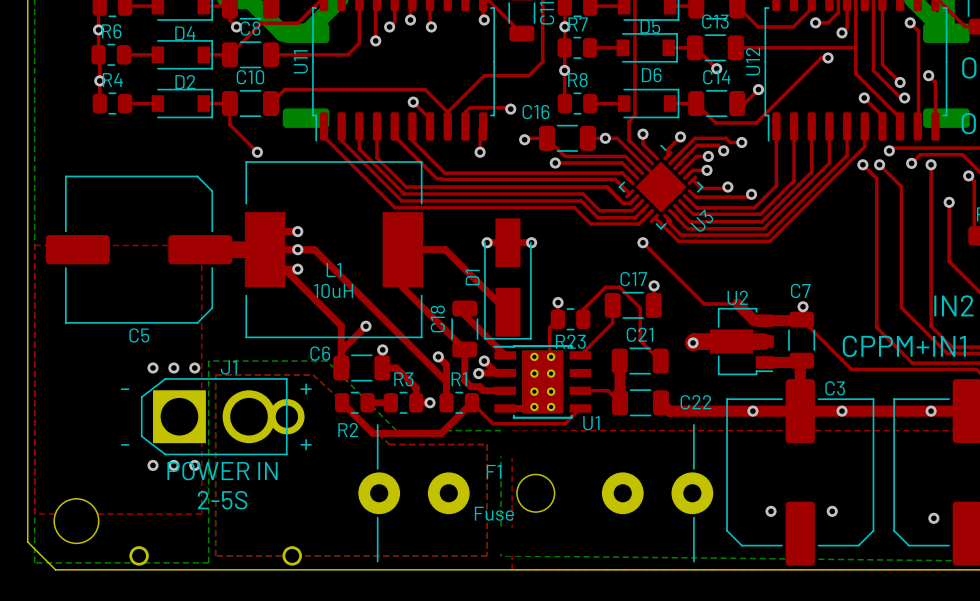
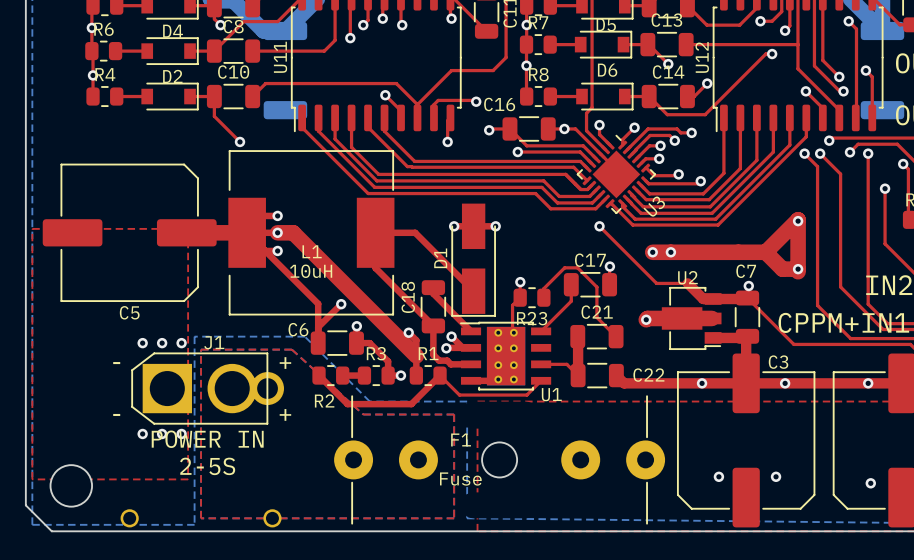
via: none -> (798, 221)
top track width: thin (297, 249) (314, 249) (446, 381) -> thick (277, 232) (293, 232) (416, 355)
top track: none -> (652, 252) (765, 252)
via: none -> (652, 252)
via: none -> (670, 252)
top track: none -> (765, 252) (798, 219) (798, 271)
top track: none -> (765, 252) (782, 269) (798, 269)
via: none -> (798, 269)

